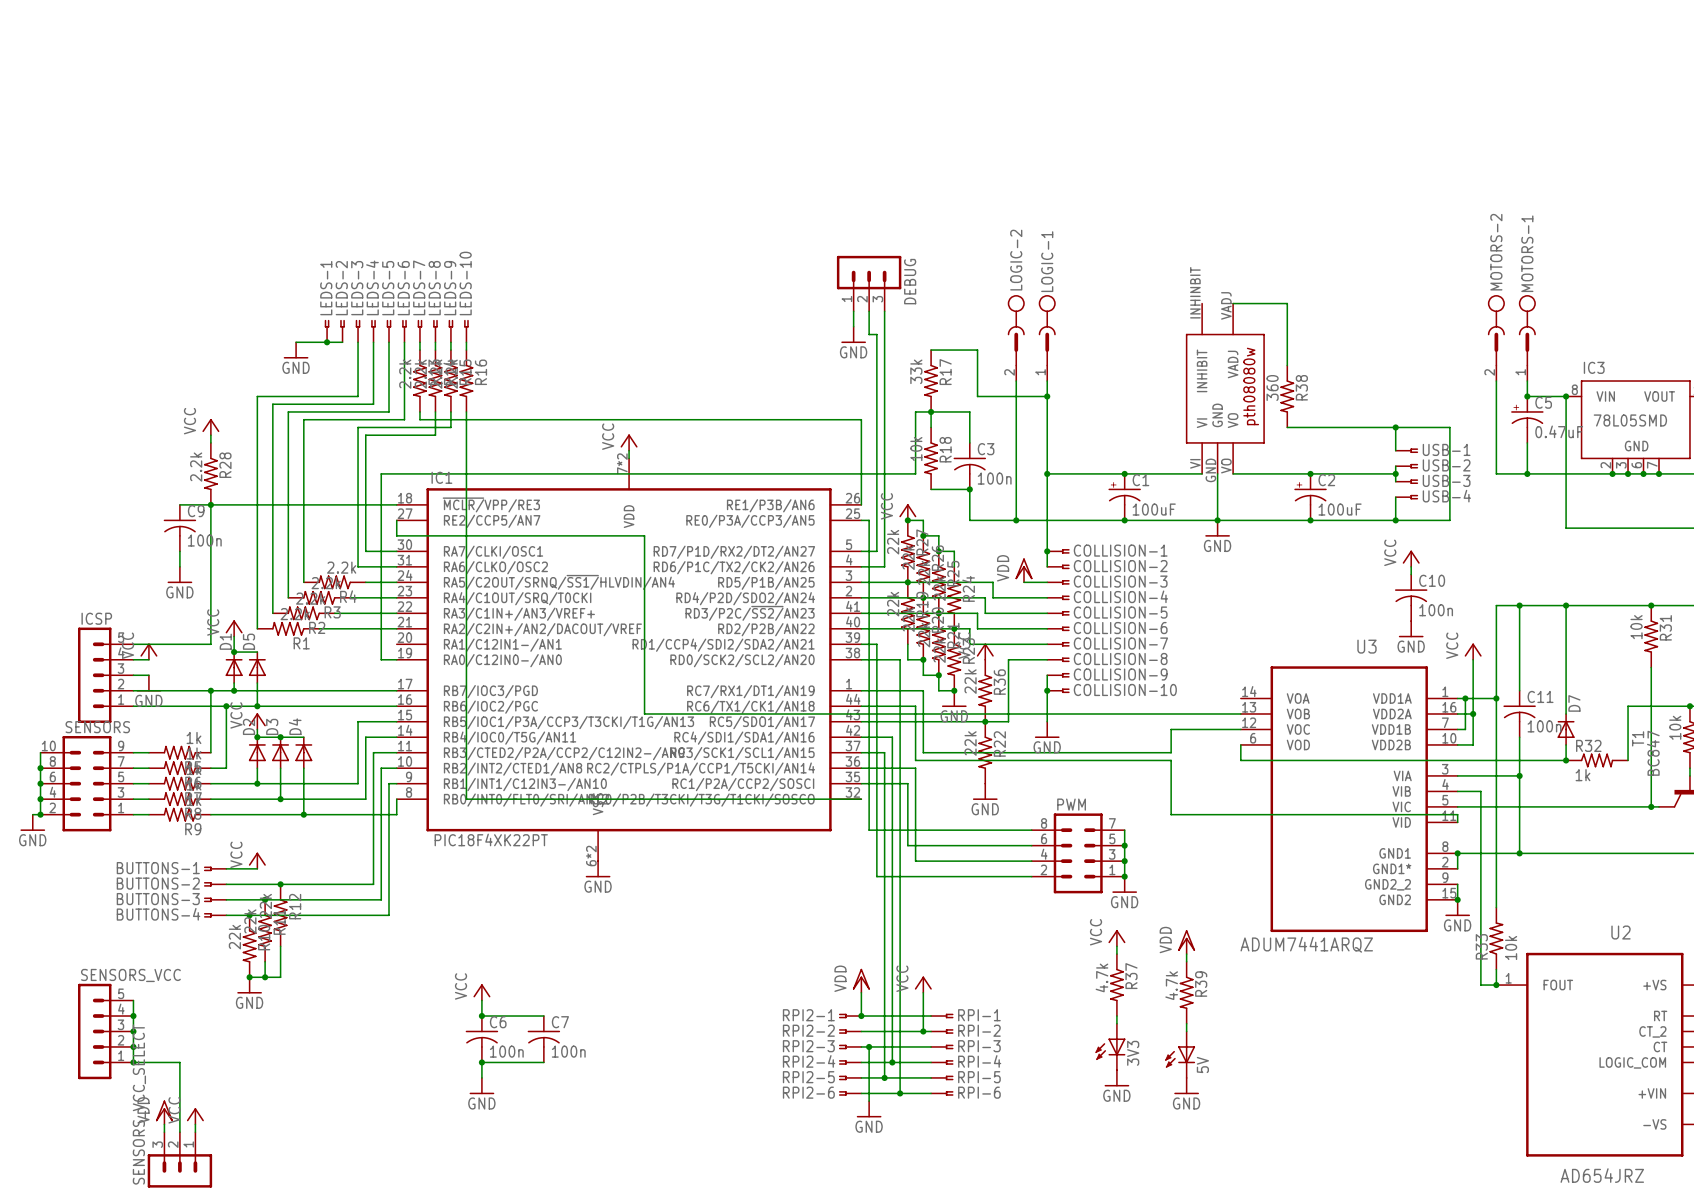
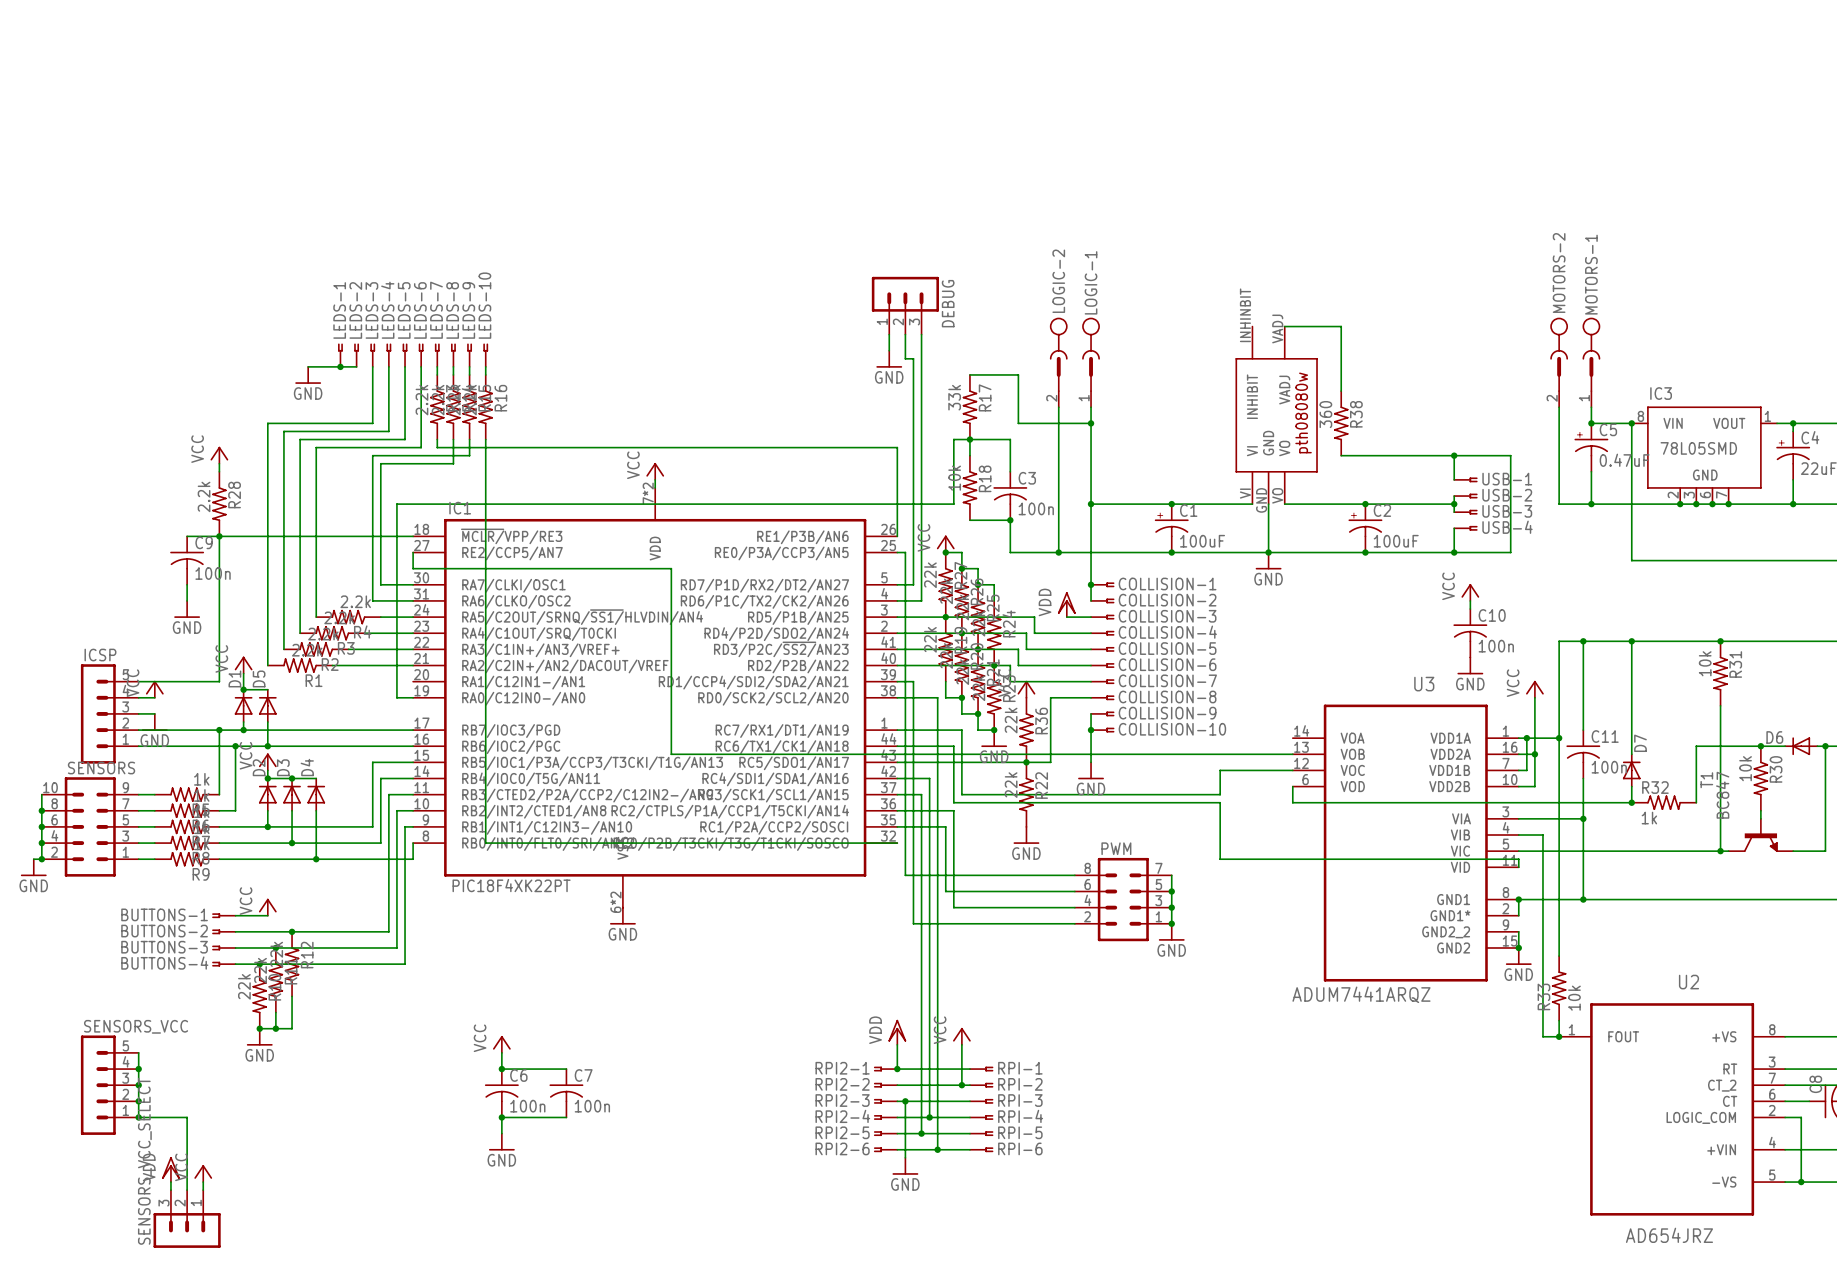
power symbol: VCC (1116, 938) -> none
power symbol: VDD (1186, 942) -> none
wire: (1116, 946) (1116, 954) -> none
wire: (1186, 954) (1186, 961) -> none
R37: 4.7k (1116, 985) -> none
R39: 4.7k (1186, 992) -> none
wire: (1116, 1016) (1116, 1023) -> none
wire: (1186, 1023) (1186, 1031) -> none
3V3: (1110, 1046) -> none
5V: (1180, 1054) -> none
power symbol: GND (1116, 1078) -> none
power symbol: GND (1186, 1086) -> none

